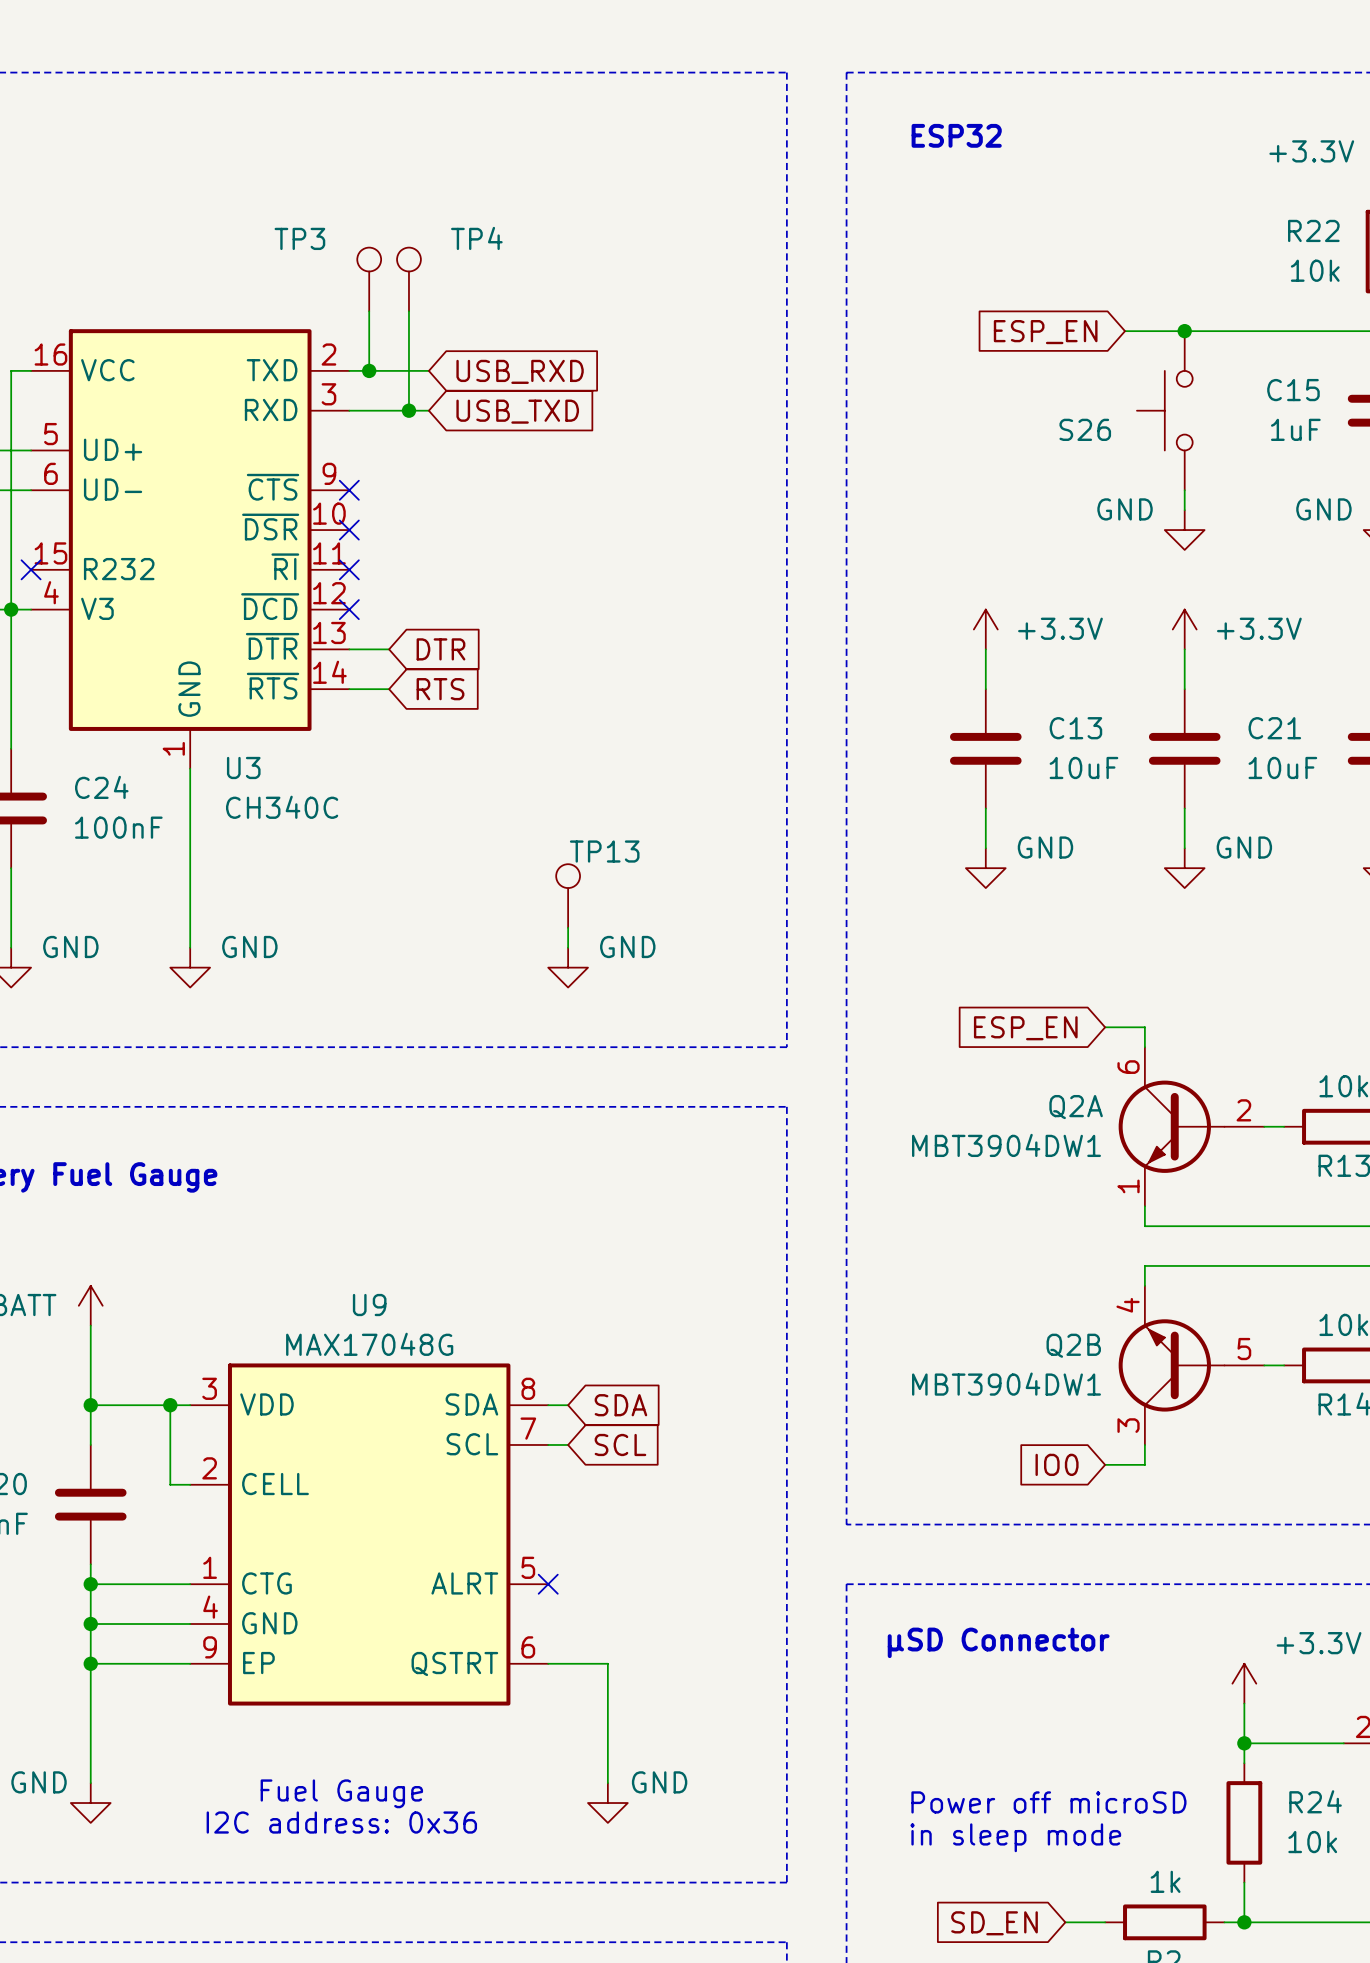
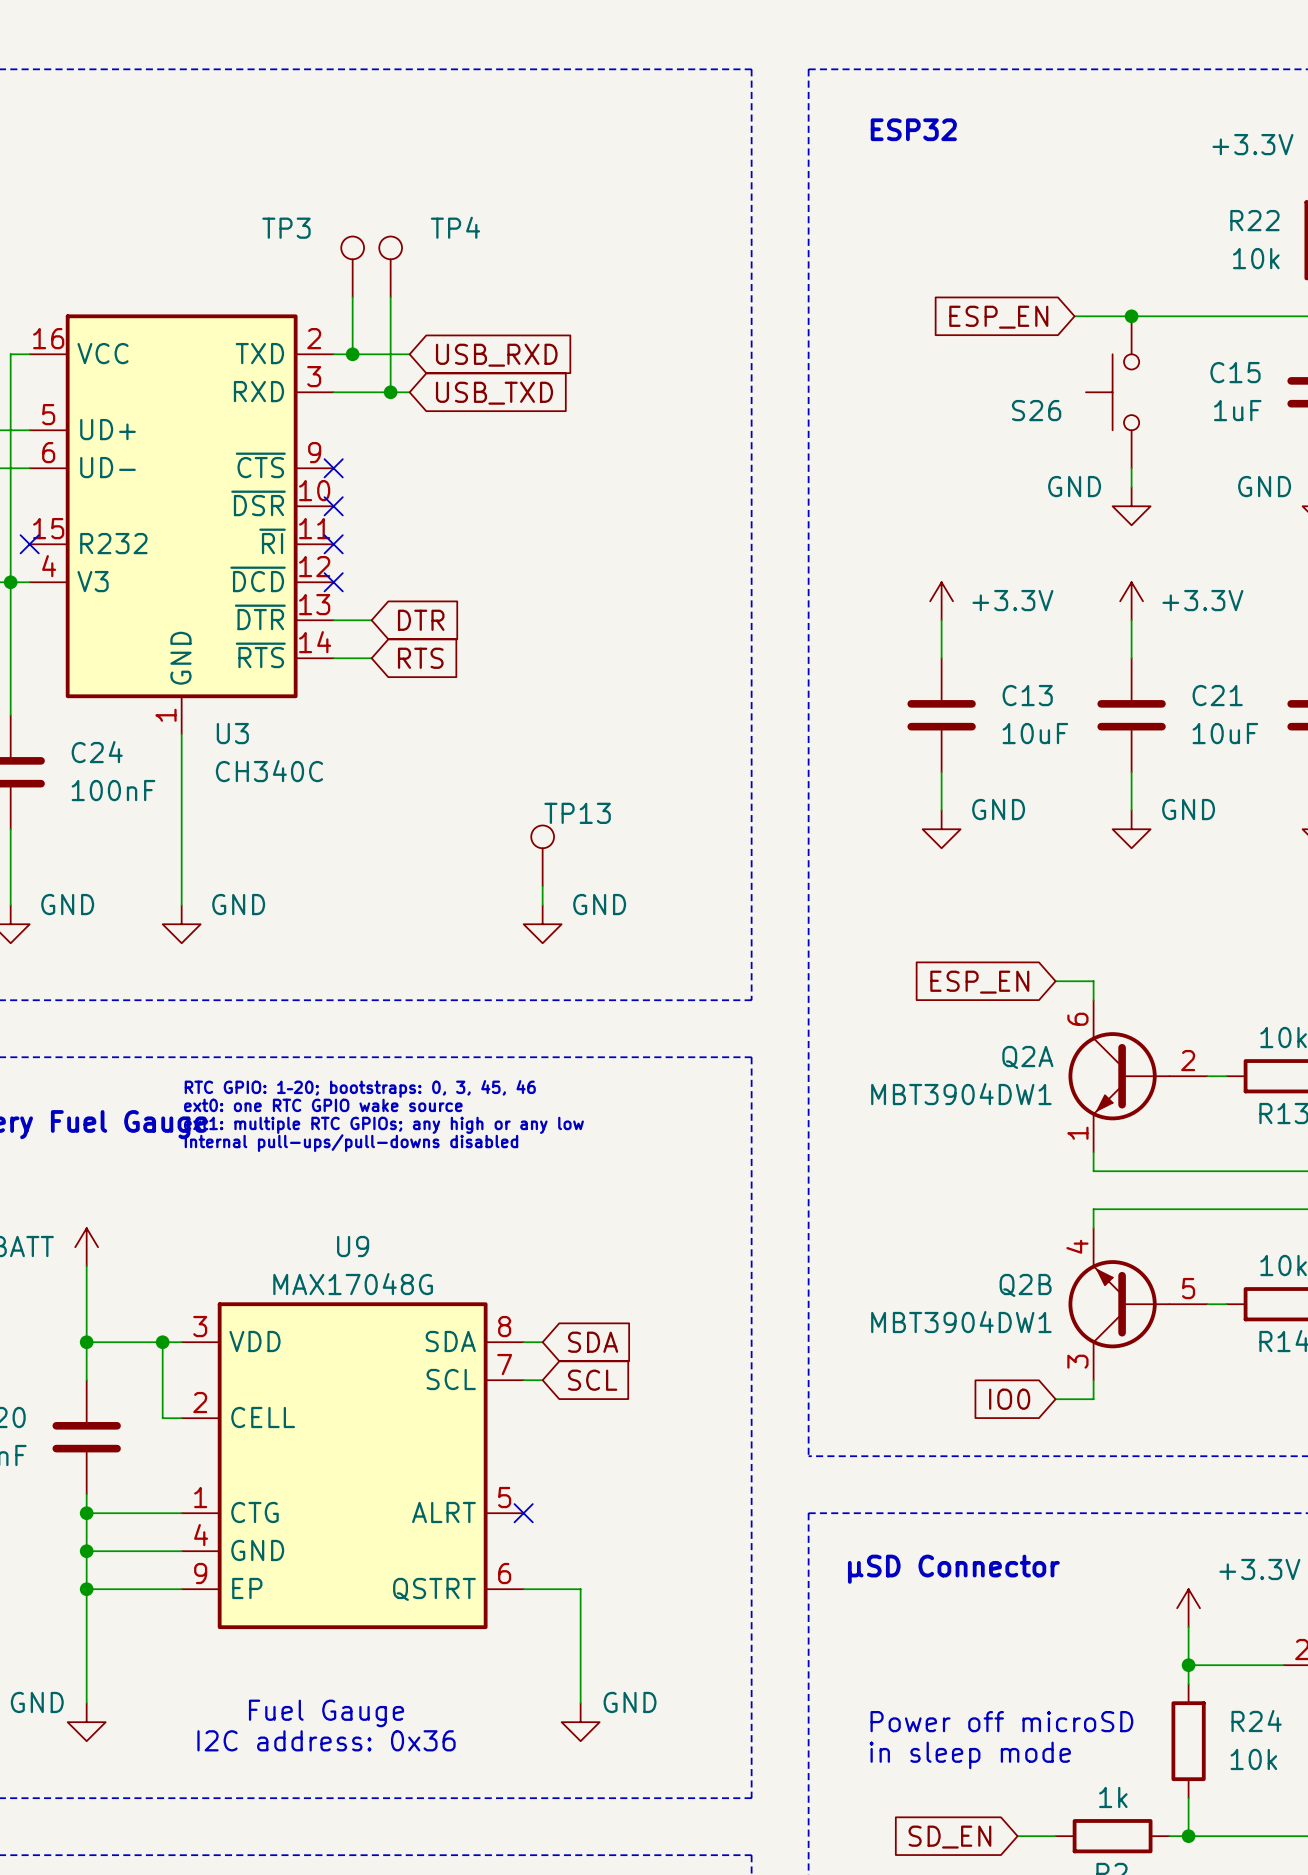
text: none -> RTC GPIO: 1–20; bootstraps: 0, 3, 45, 46 (360, 1088)
text: none -> ext0: one RTC GPIO wake source (323, 1105)
text: none -> ext1: multiple RTC GPIOs; any high or any low (384, 1125)
text: none -> Internal pull-ups/pull-downs disabled (351, 1143)

